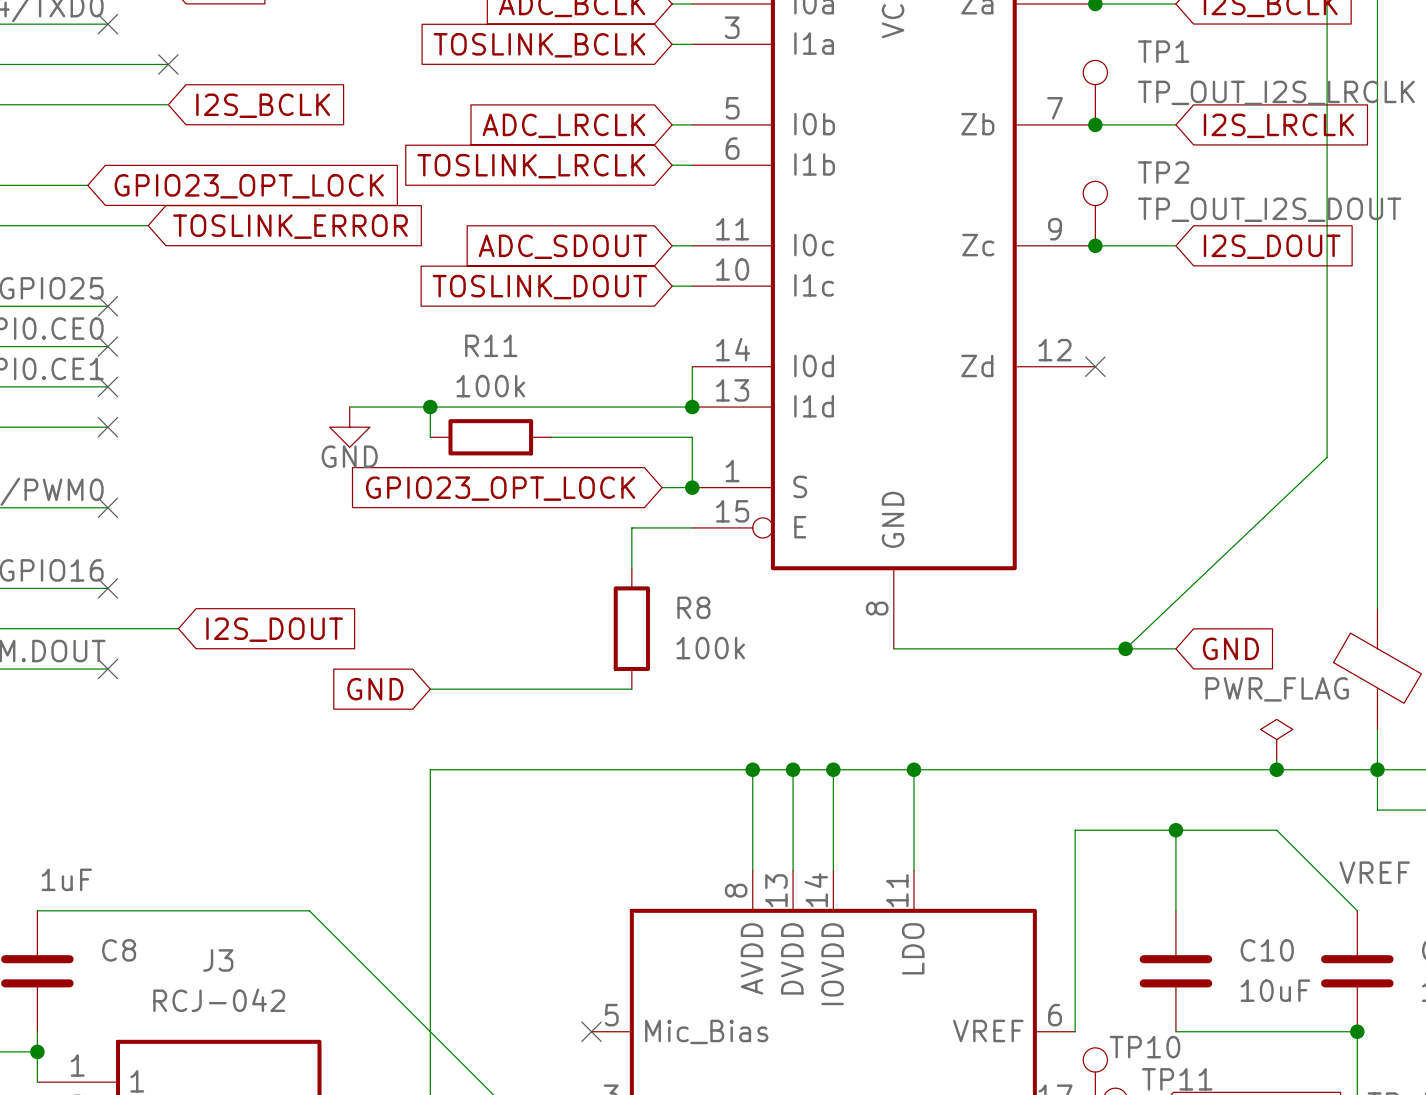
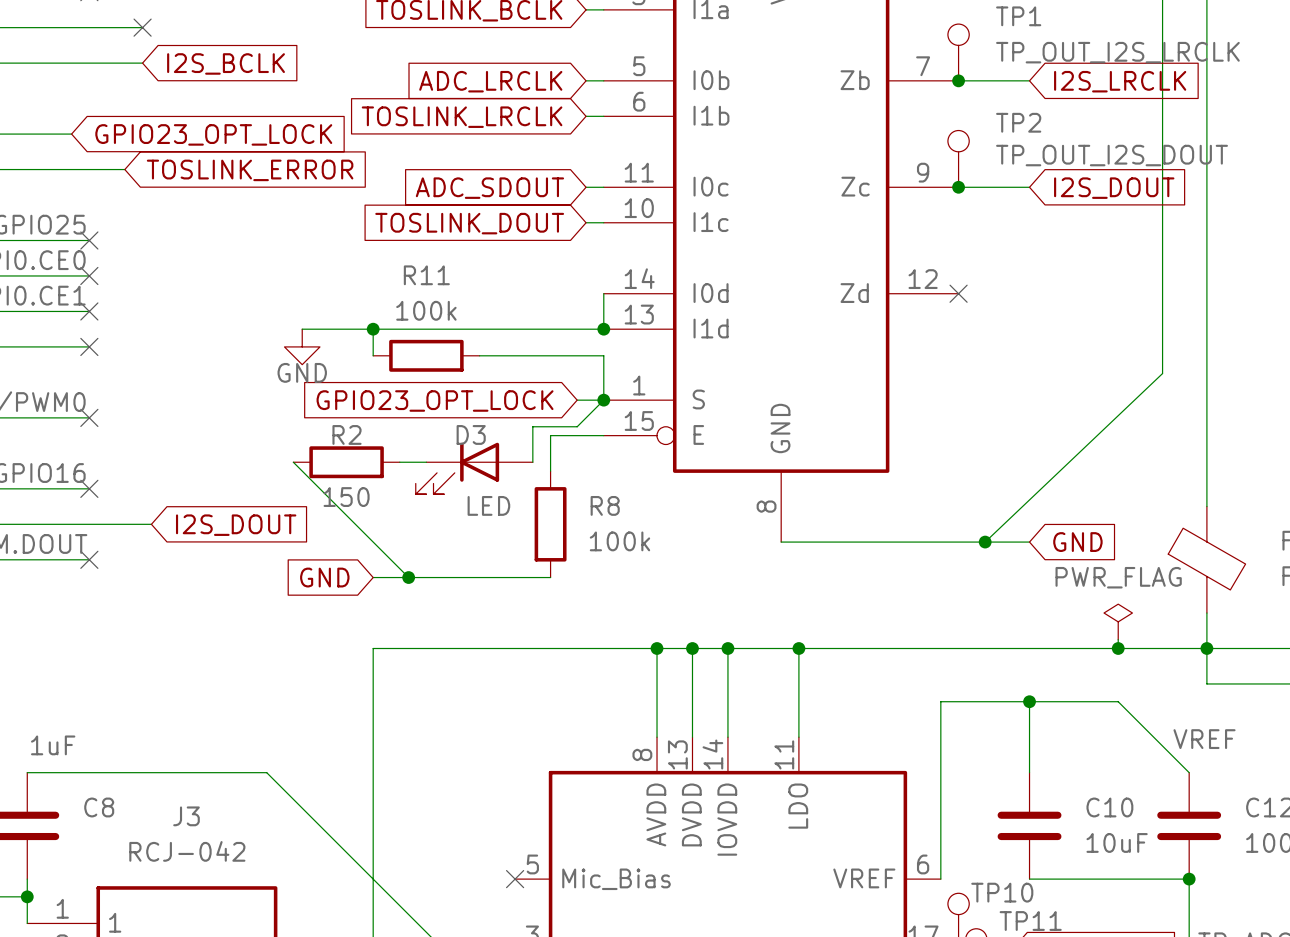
wire: none -> (603, 400) (577, 426) (532, 426) (532, 462)
wire: none -> (293, 462) (408, 577)
R2: none -> 150 (346, 462)
wire: none -> (399, 462) (426, 462)
D3: none -> LED (474, 468)
junction: none -> (408, 577)

